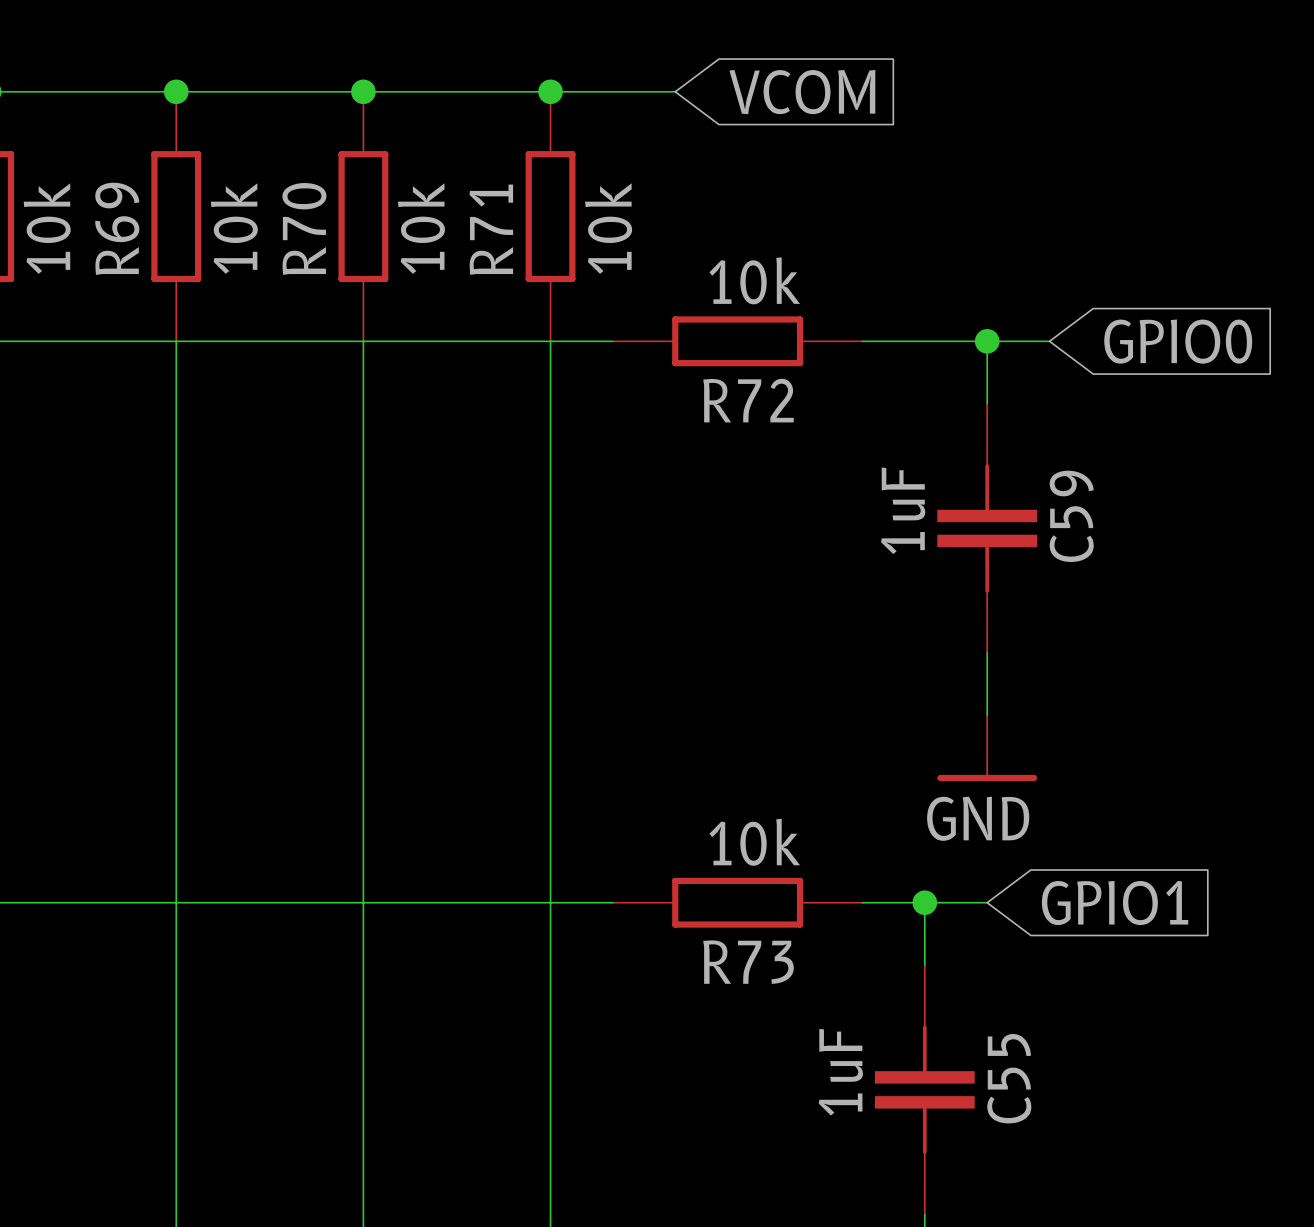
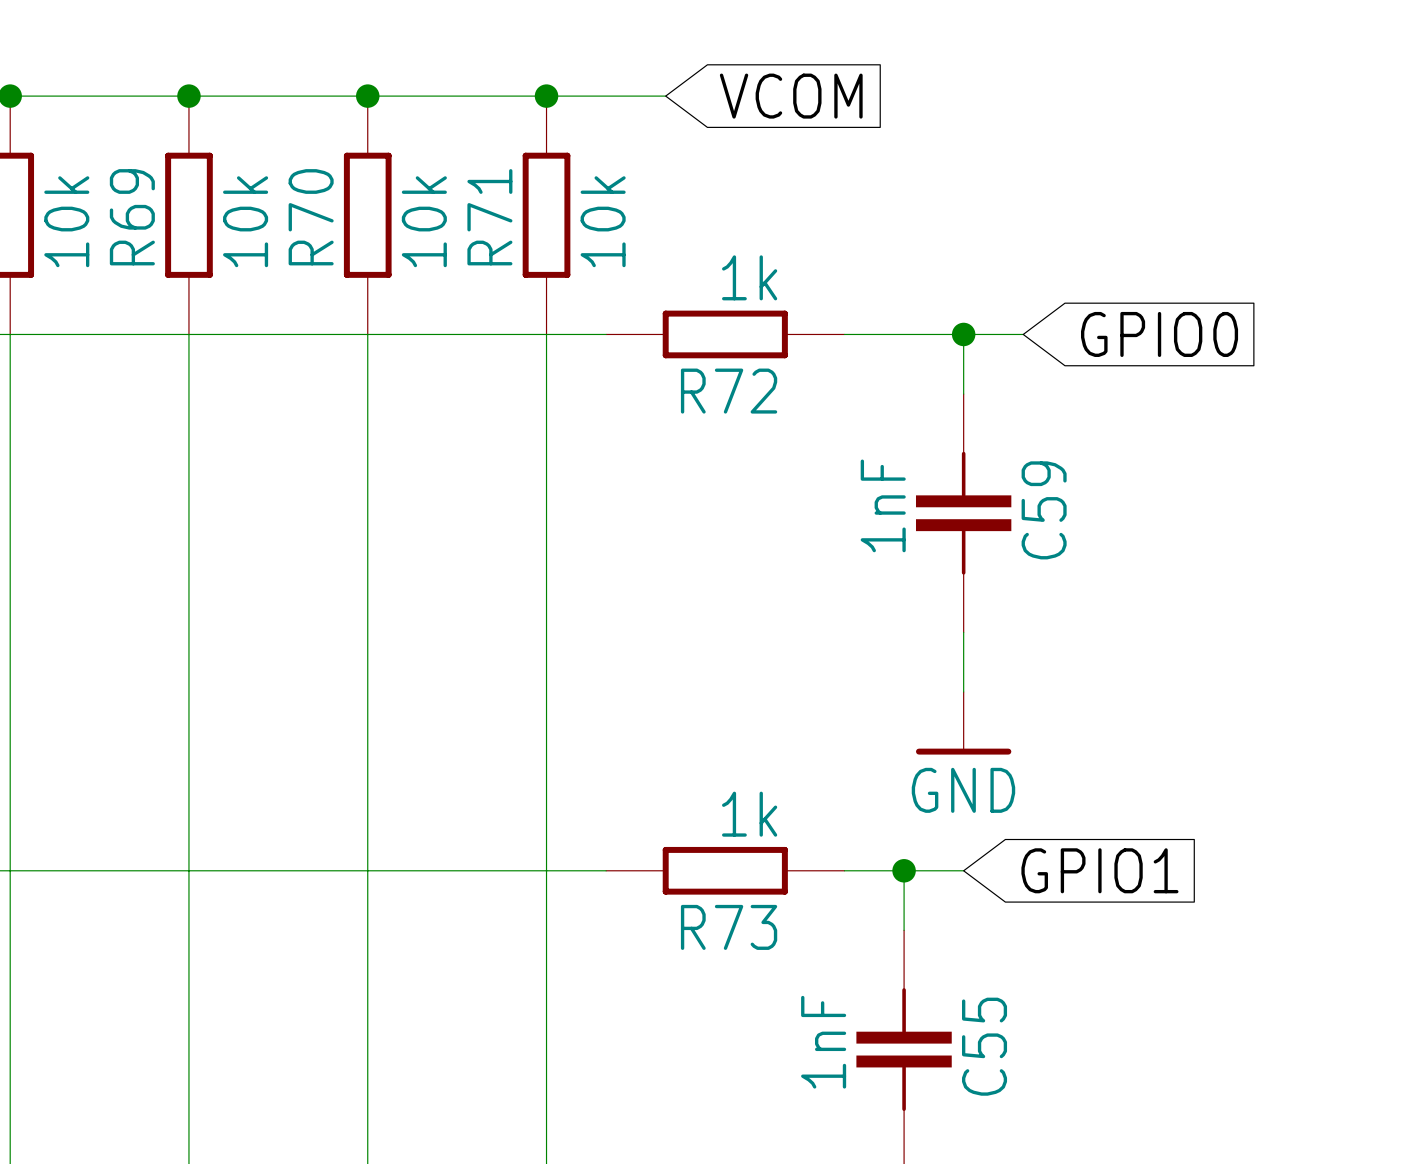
R72 value: 10k (754, 280) -> 1k (749, 277)
C59 value: 1uF (903, 510) -> 1nF (883, 505)
R73 value: 10k (754, 842) -> 1k (749, 814)
C55 value: 1uF (840, 1072) -> 1nF (823, 1042)

